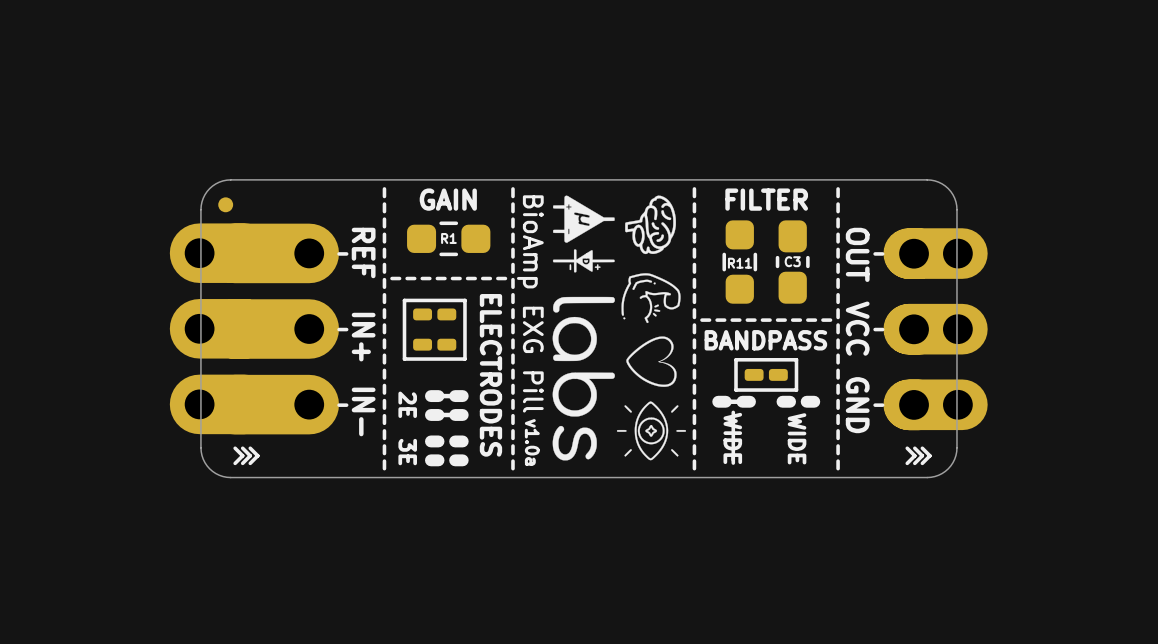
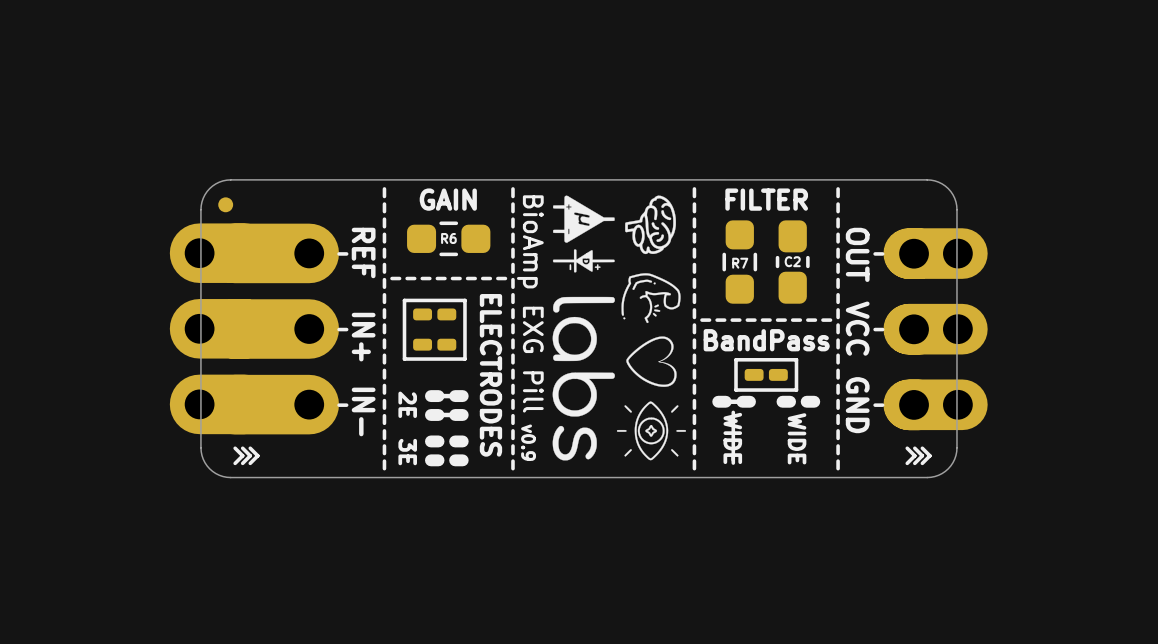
R1 name: R1 (448, 238) -> R6 (448, 238)
C3 name: C3 (792, 261) -> C2 (792, 261)
R11 name: R11 (740, 263) -> R7 (740, 263)
text: BANDPASS (765, 340) -> BandPass (766, 340)
text: v1.0a (532, 442) -> v0.9 (528, 442)

